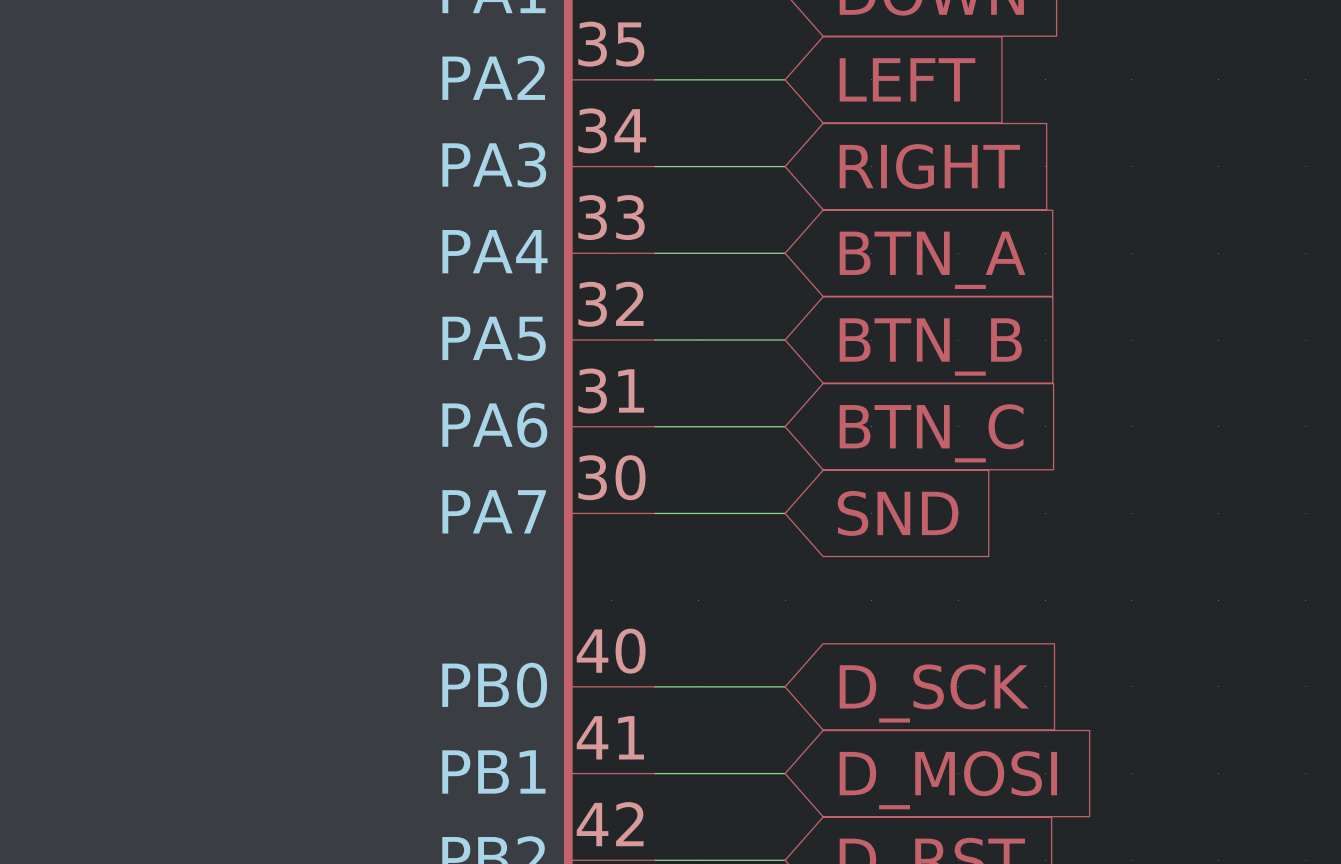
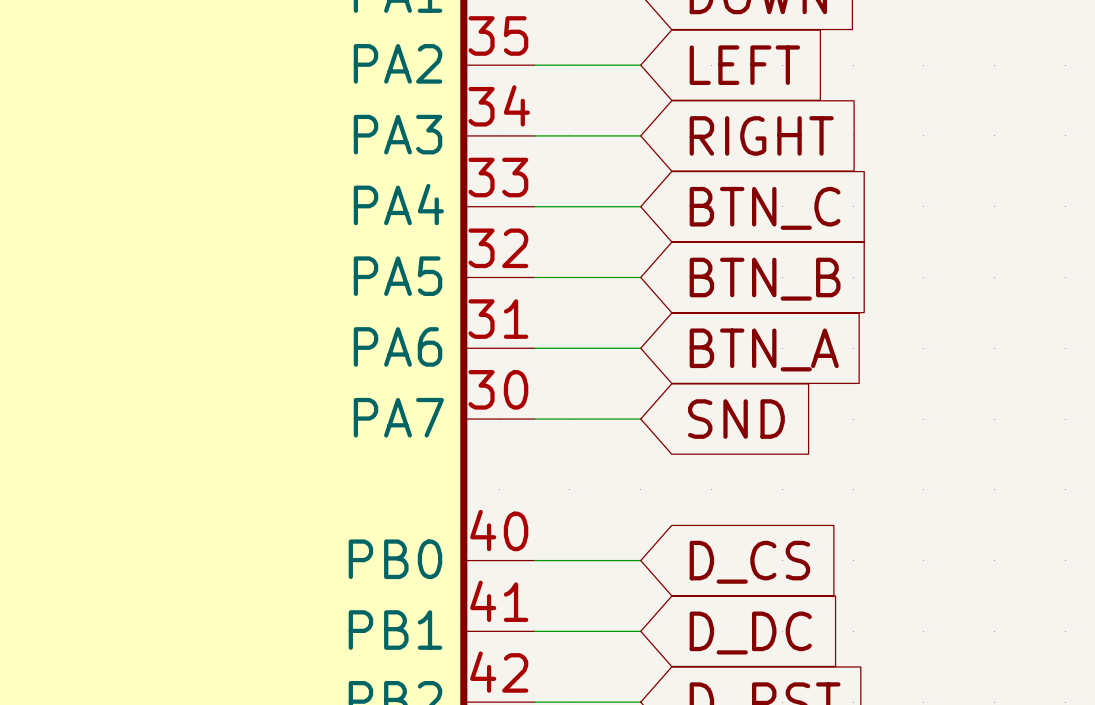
global label: BTN_A (932, 260) -> BTN_C (765, 208)
global label: BTN_C (931, 433) -> BTN_A (764, 349)
global label: D_SCK (934, 693) -> D_CS (749, 562)
global label: D_MOSI (948, 780) -> D_DC (750, 633)

